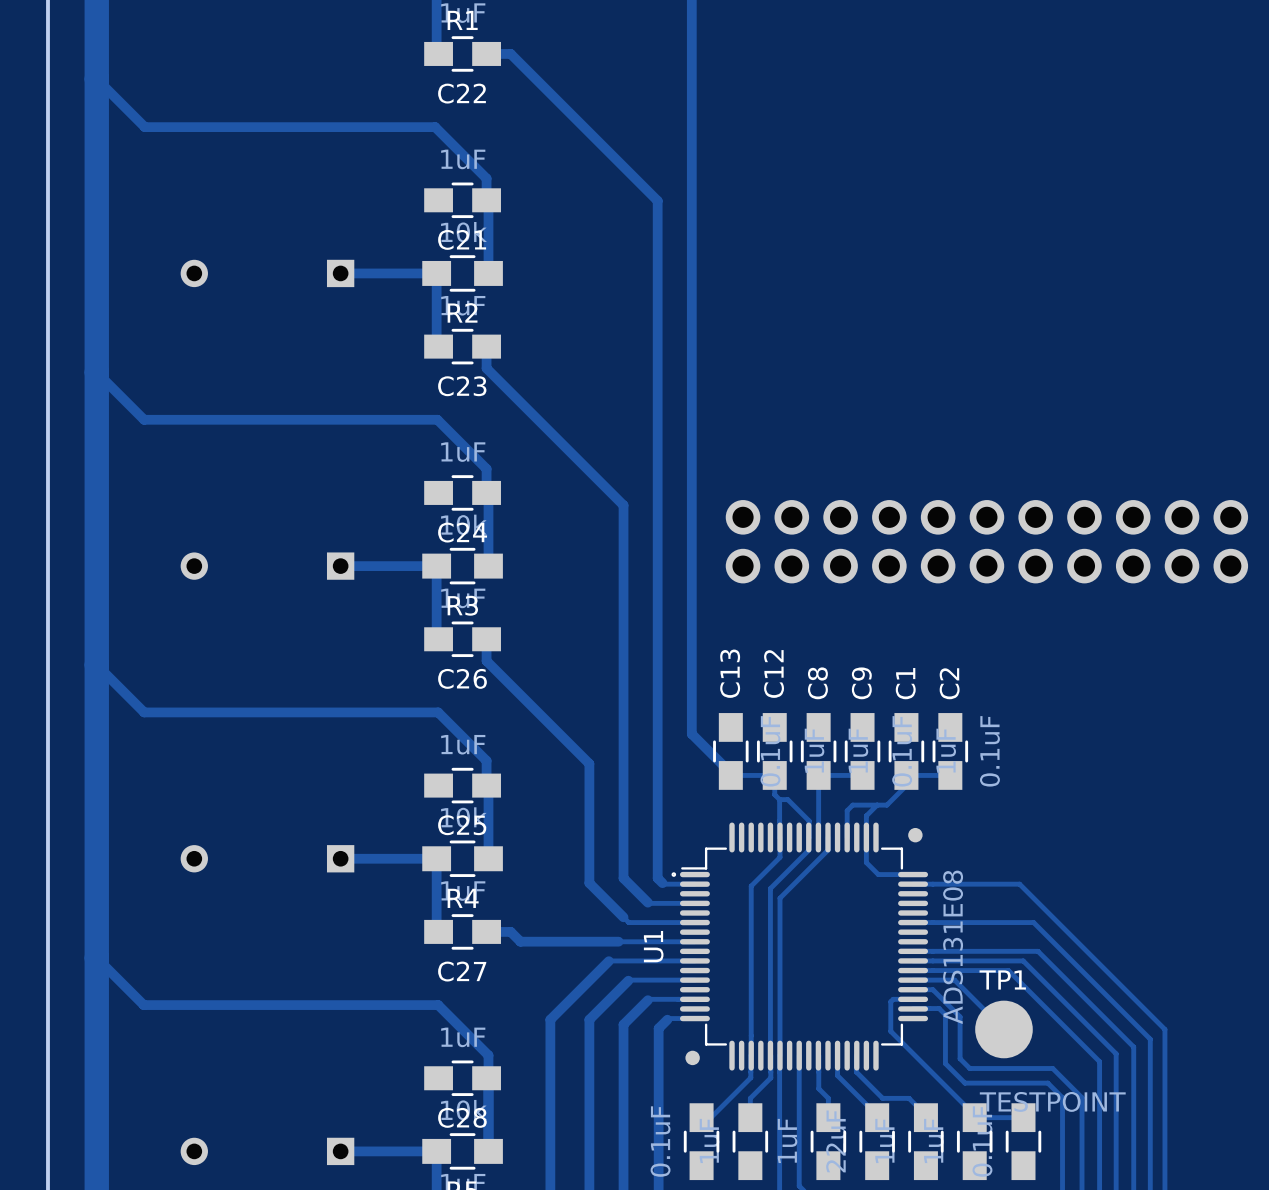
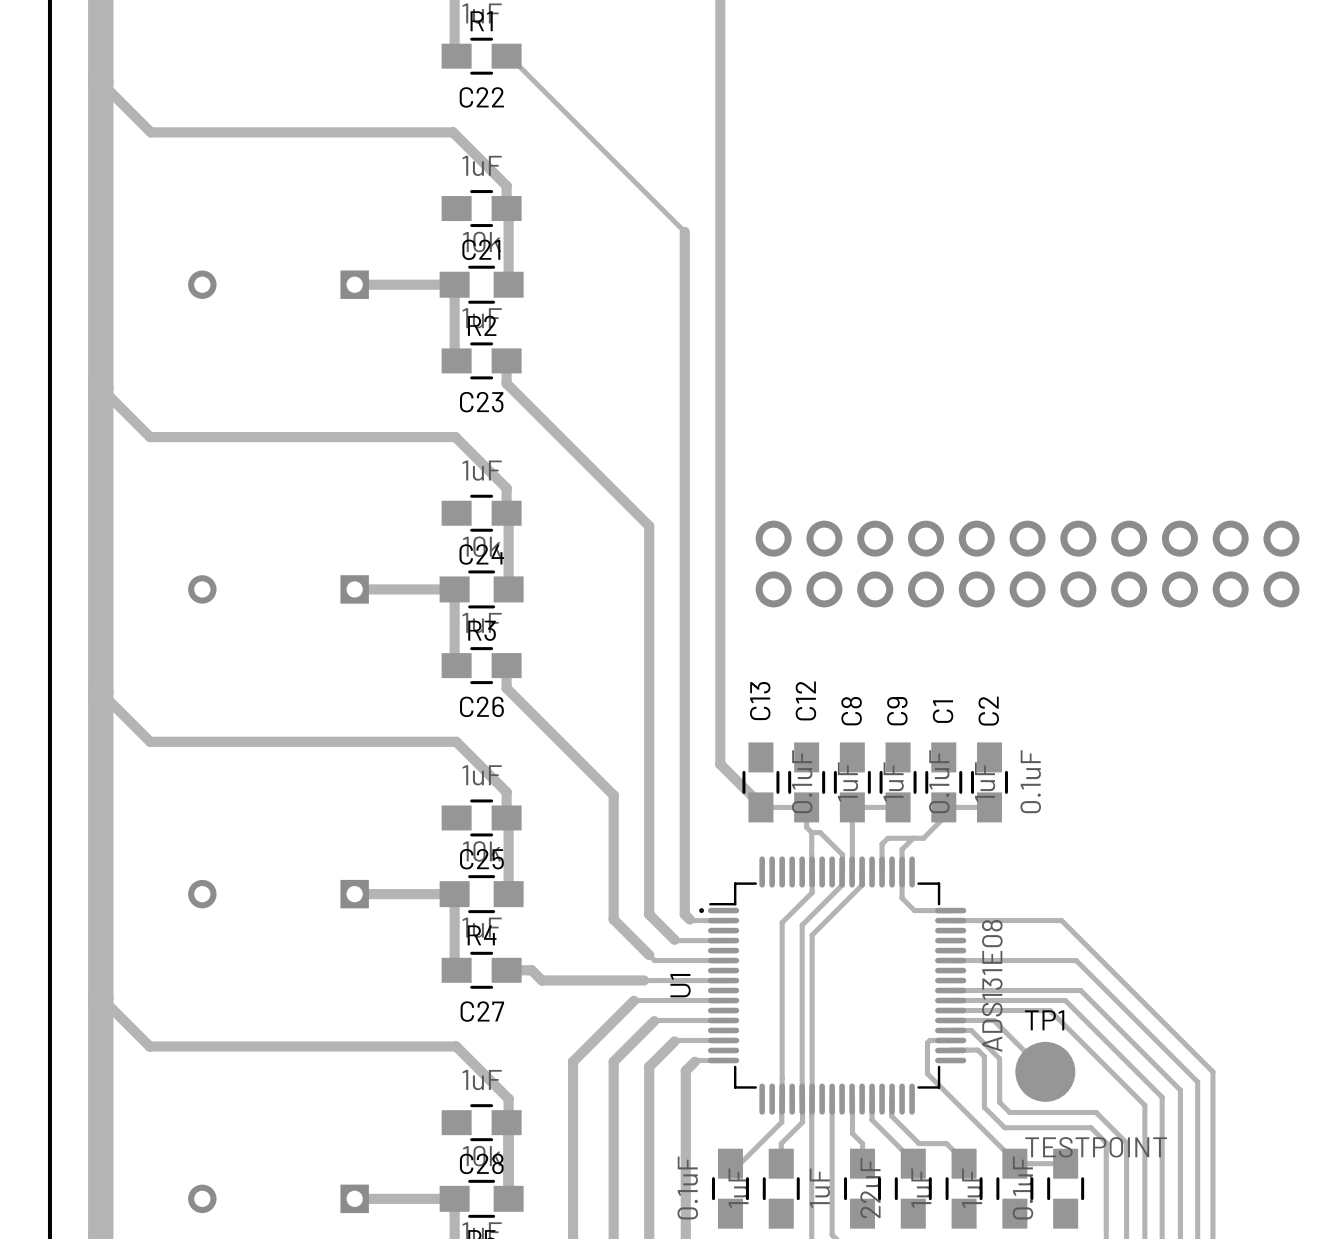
track: (488, 53) (510, 53) (657, 200) (657, 222) -> (509, 56) (684, 231)
U1 footprint: [671, 822, 929, 1071] -> [699, 856, 967, 1115]

